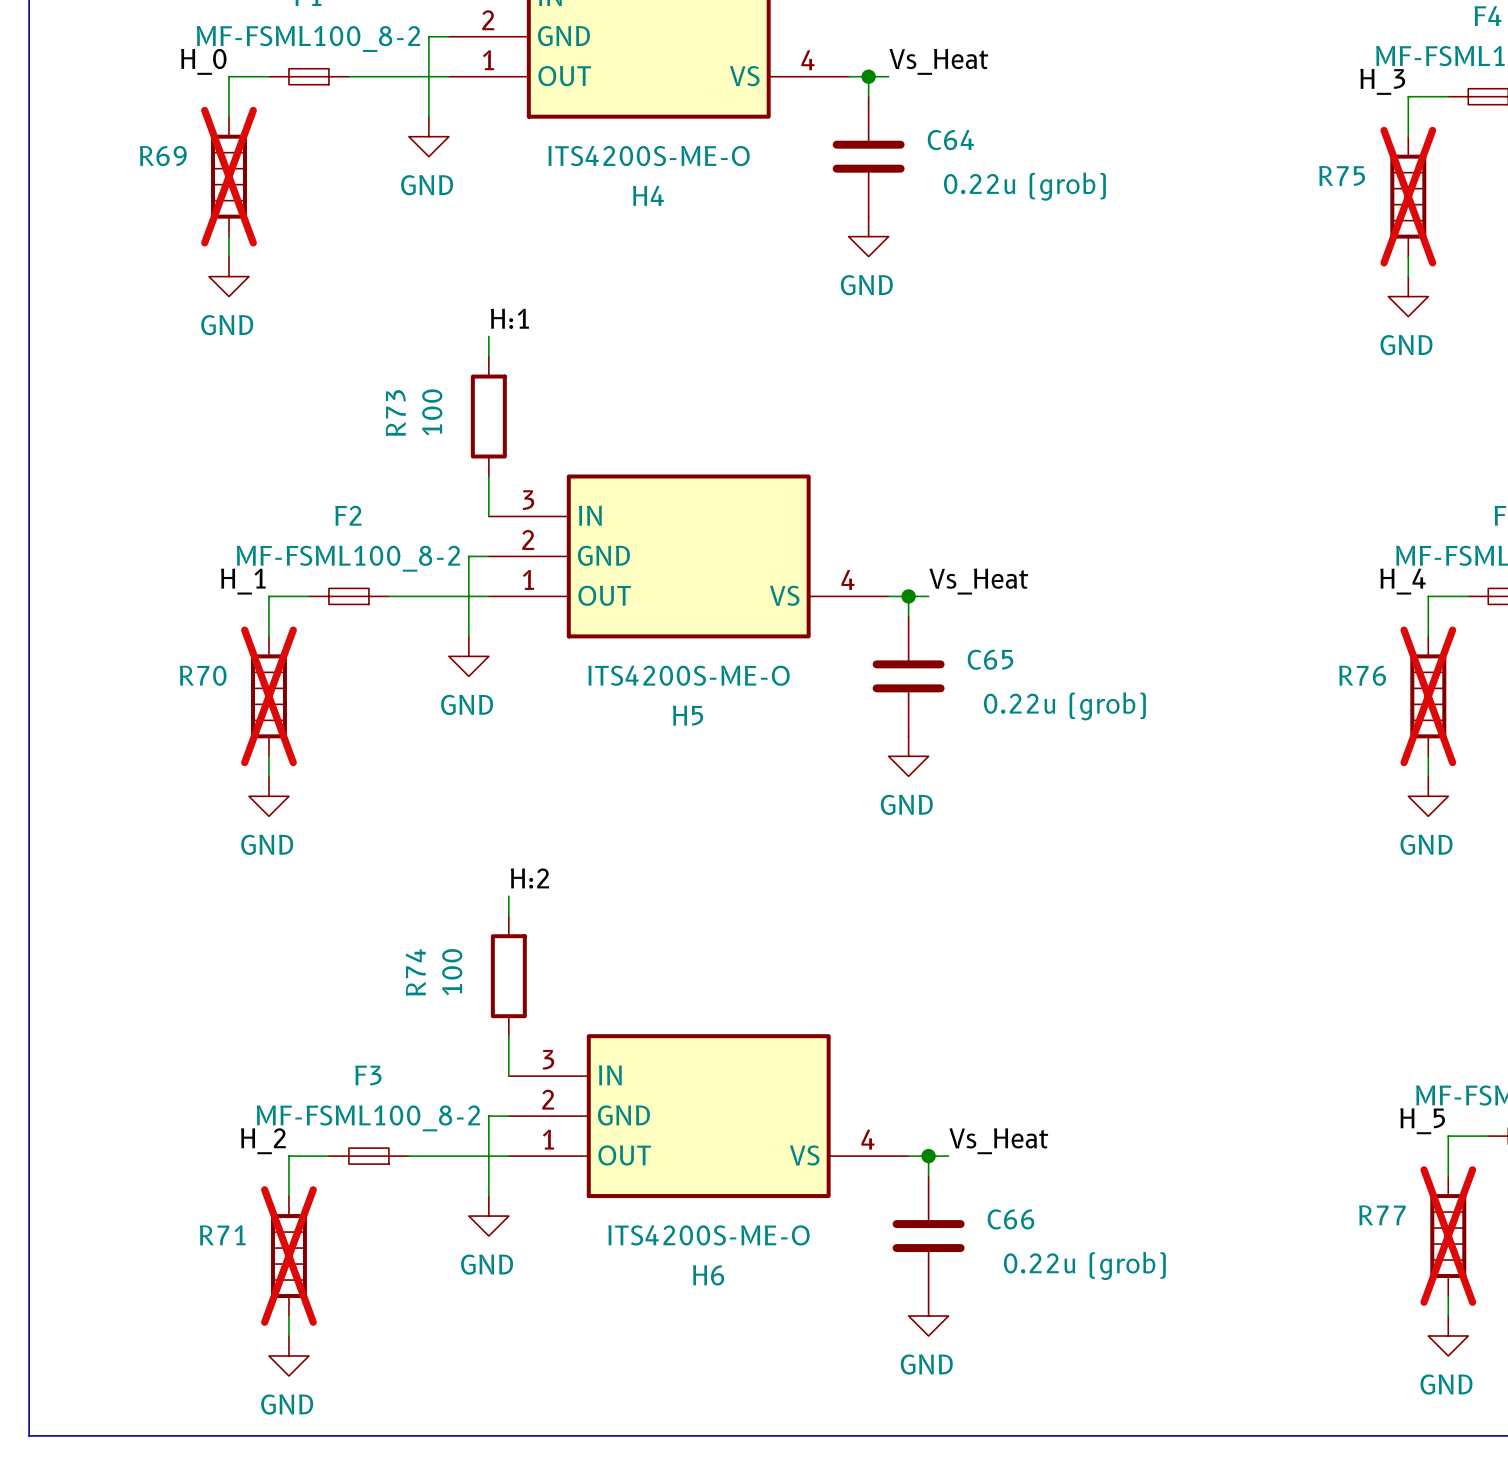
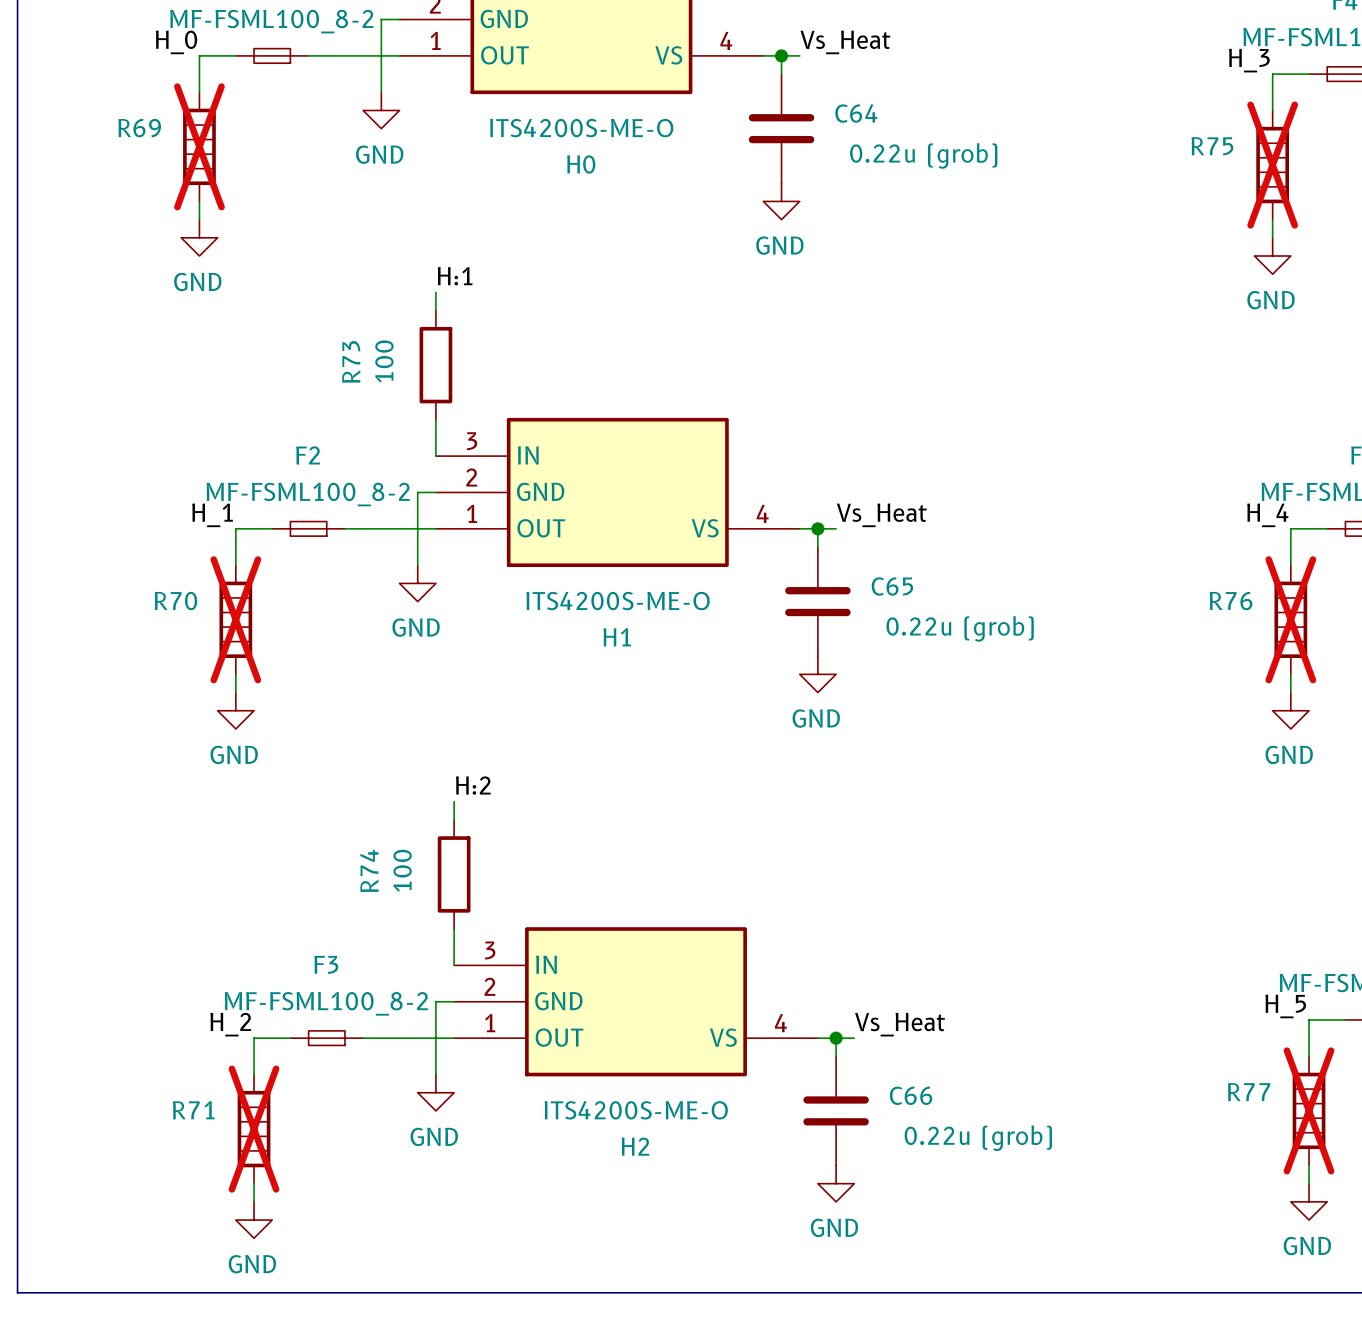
H4 name: H4 (648, 195) -> H0 (581, 164)
H5 name: H5 (688, 715) -> H1 (617, 637)
H6 name: H6 (708, 1275) -> H2 (635, 1146)

